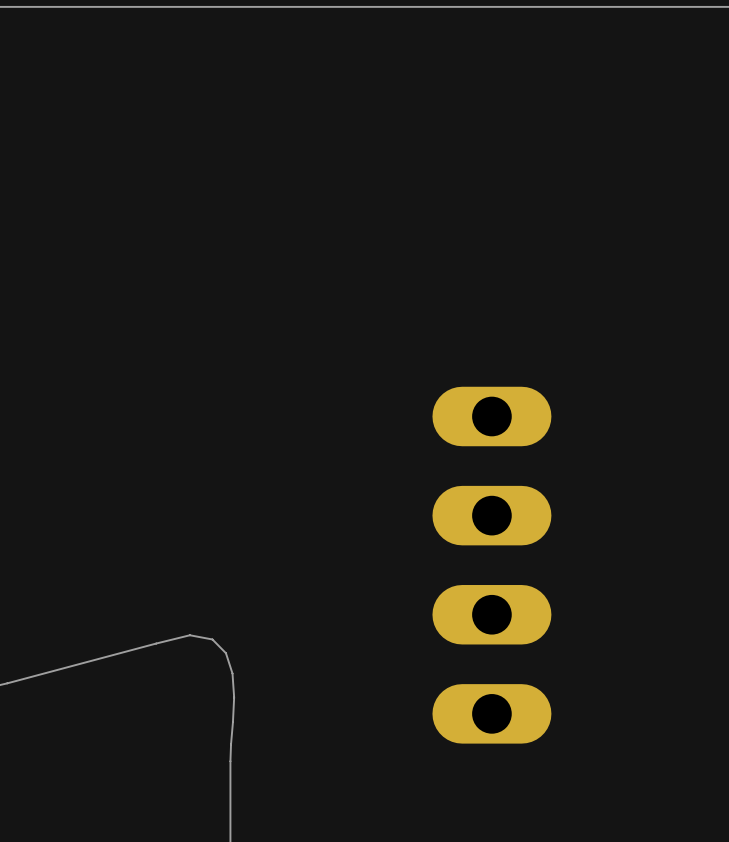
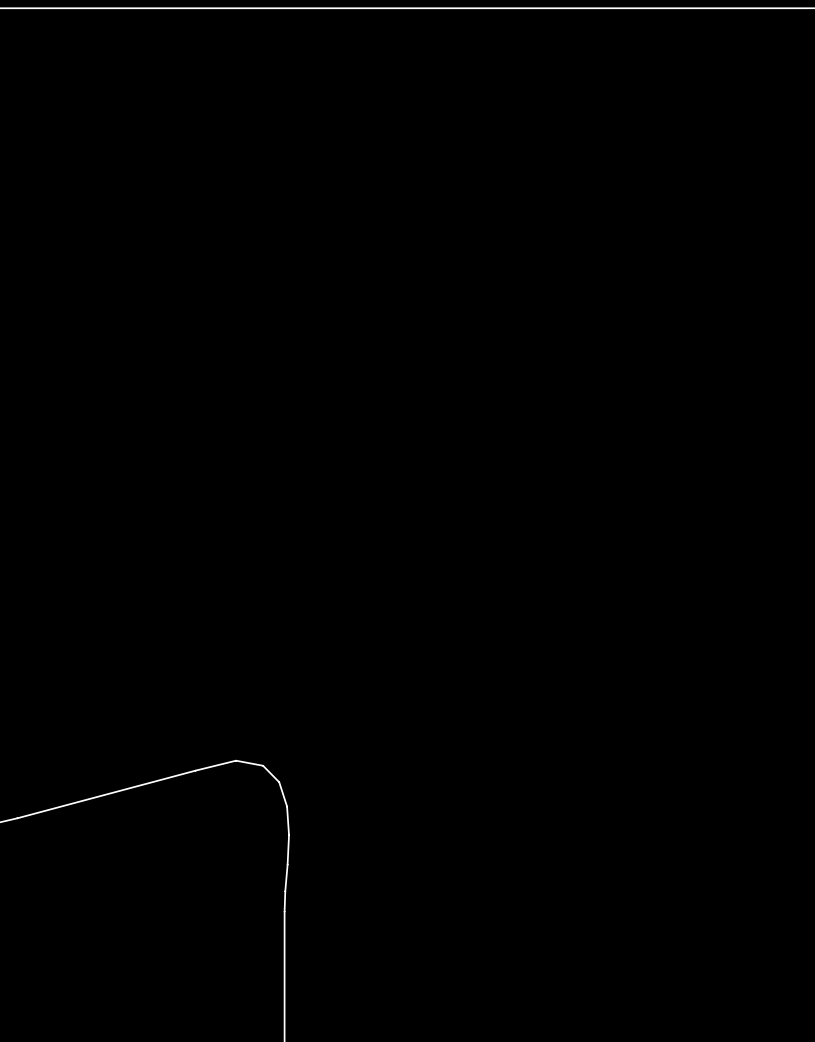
part: (491, 565) -> none

